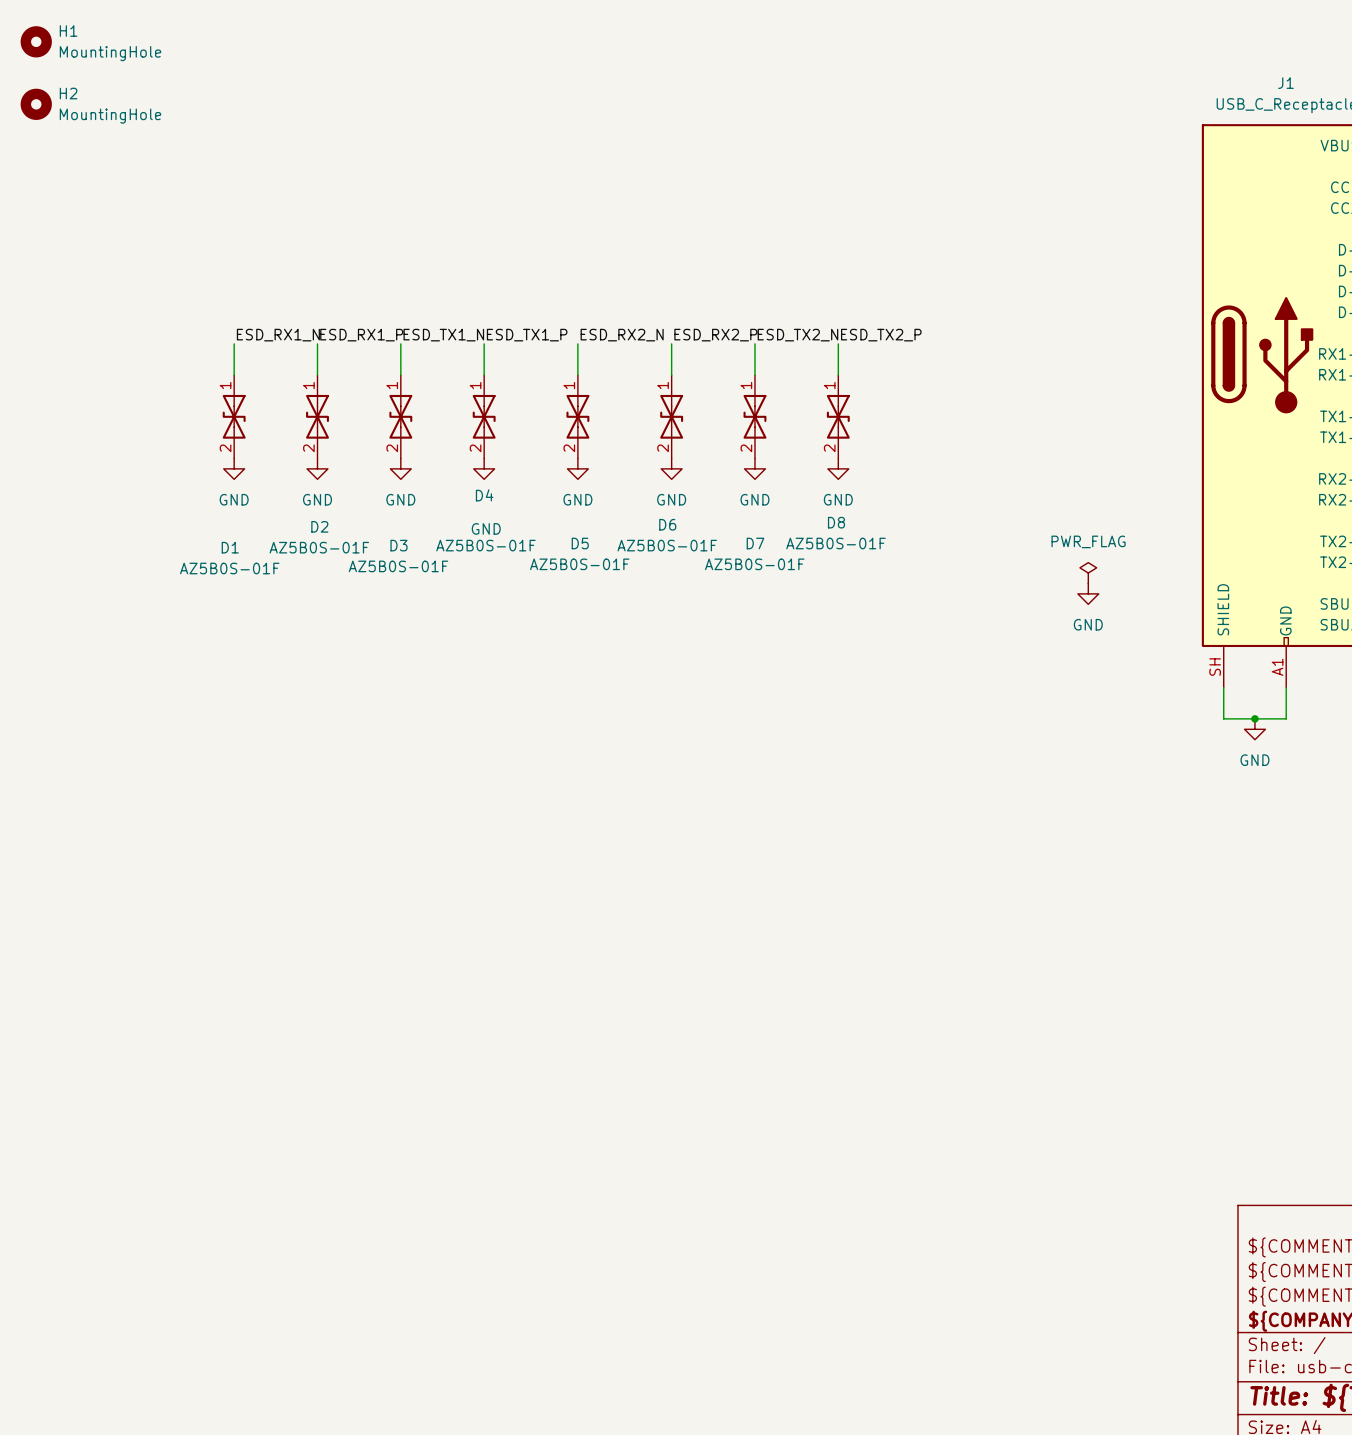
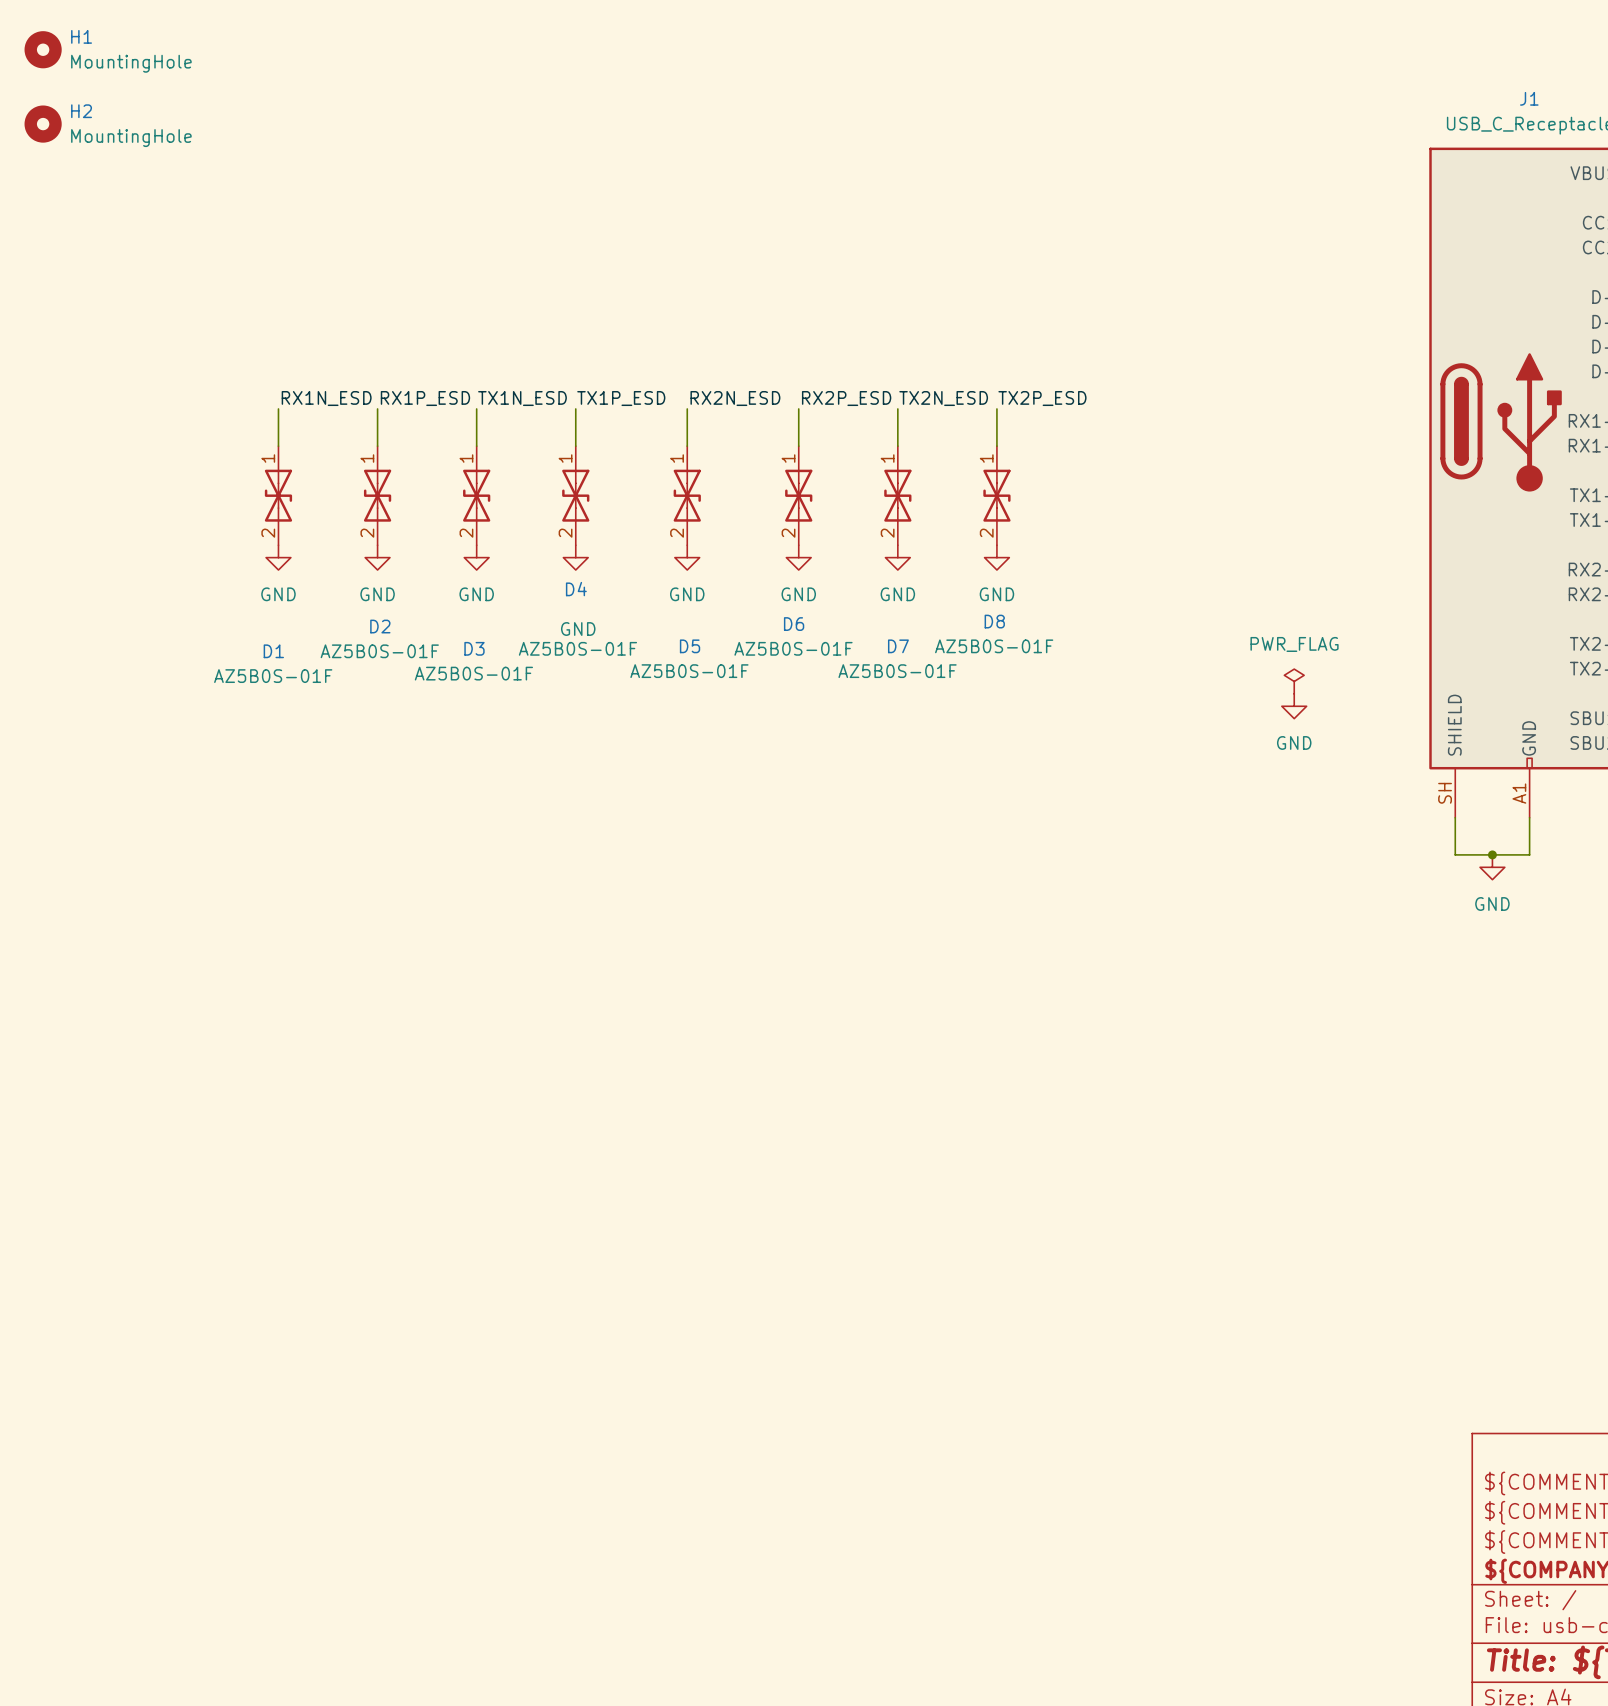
label: ESD_RX1_N (278, 335) -> RX1N_ESD (326, 398)
label: ESD_RX1_P (361, 335) -> RX1P_ESD (425, 398)
label: ESD_TX1_N (443, 335) -> TX1N_ESD (522, 398)
label: ESD_TX1_P (527, 335) -> TX1P_ESD (621, 398)
label: ESD_RX2_N (622, 335) -> RX2N_ESD (735, 398)
label: ESD_RX2_P (715, 335) -> RX2P_ESD (846, 398)
label: ESD_TX2_N (797, 335) -> TX2N_ESD (943, 398)
label: ESD_TX2_P (881, 335) -> TX2P_ESD (1042, 398)

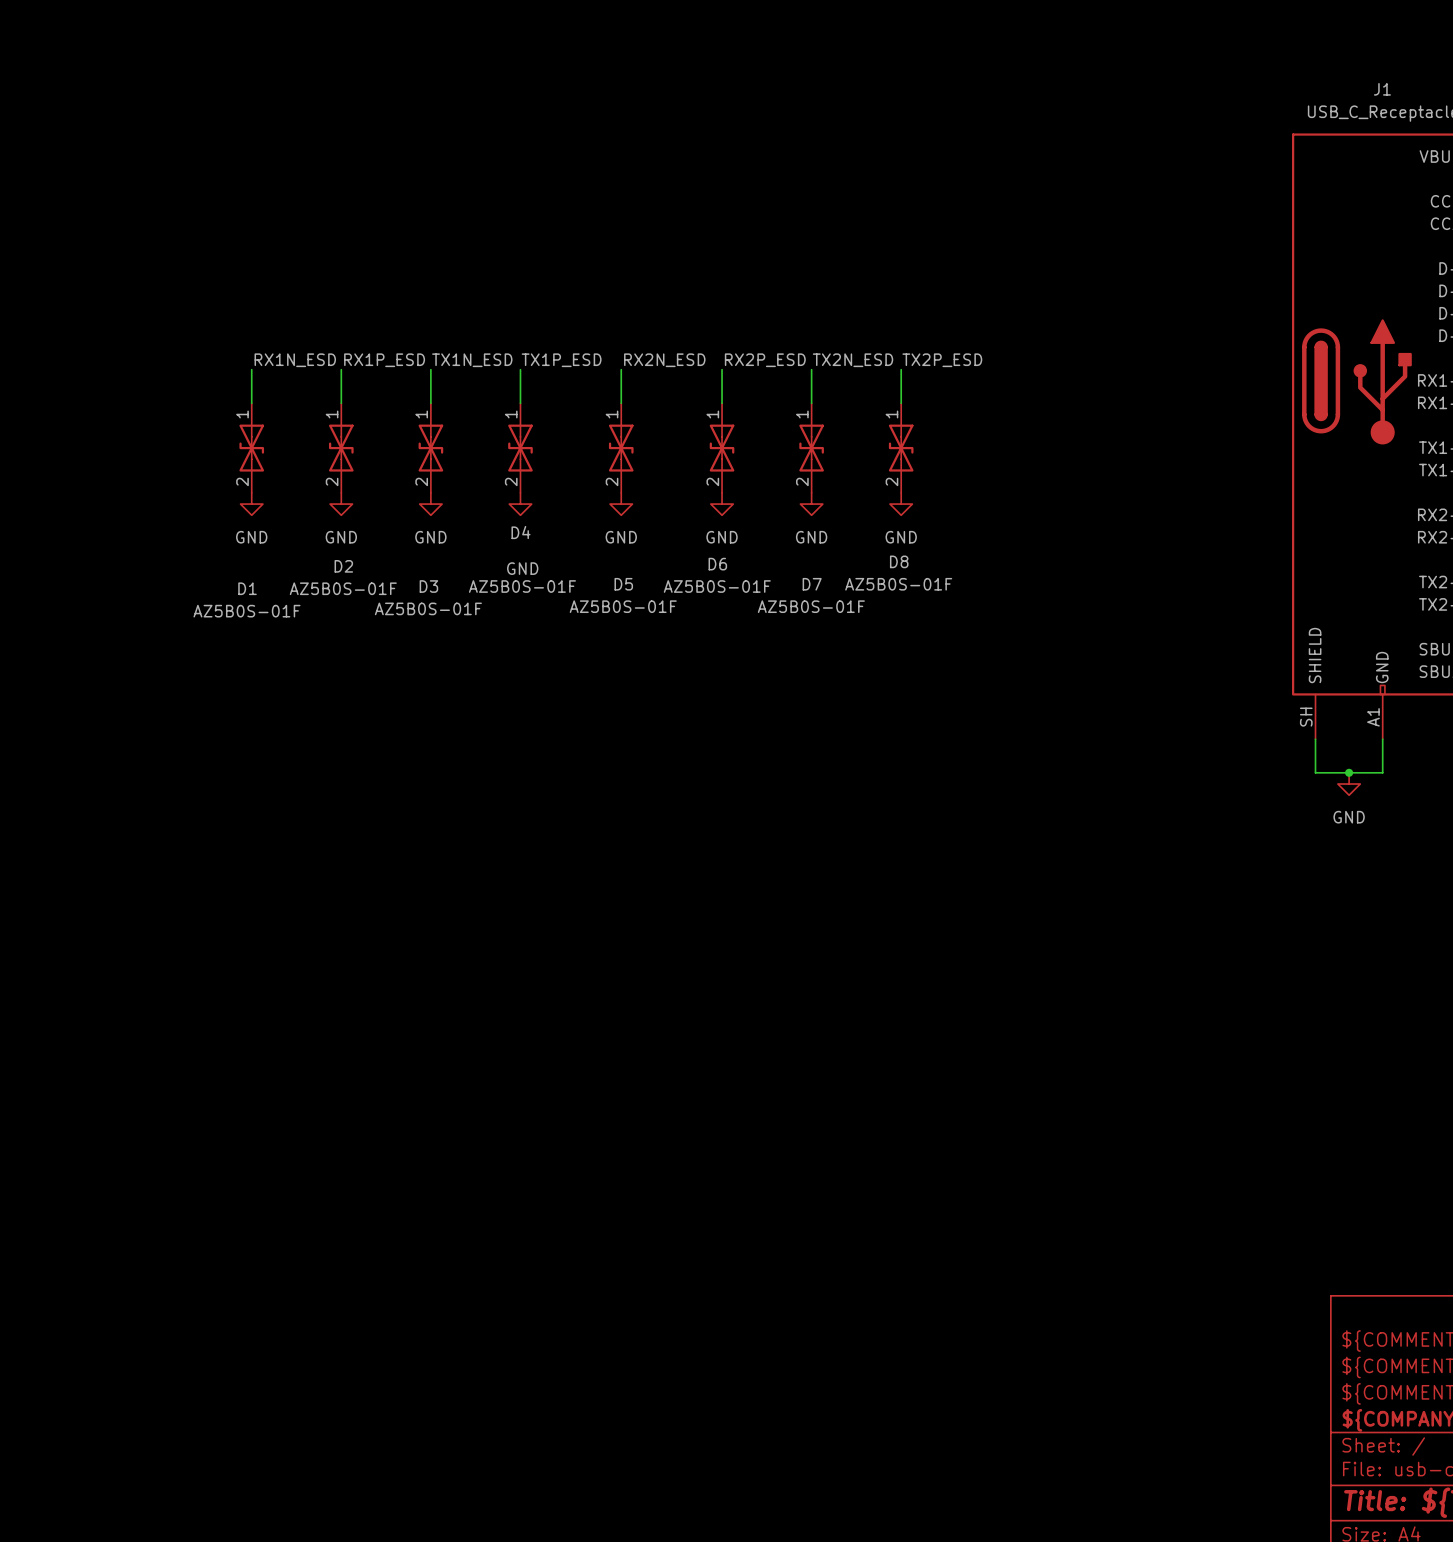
H1: MountingHole (43, 49) -> none
H2: MountingHole (43, 124) -> none
power symbol: PWR_FLAG (1294, 681) -> none
power symbol: GND (1294, 706) -> none

